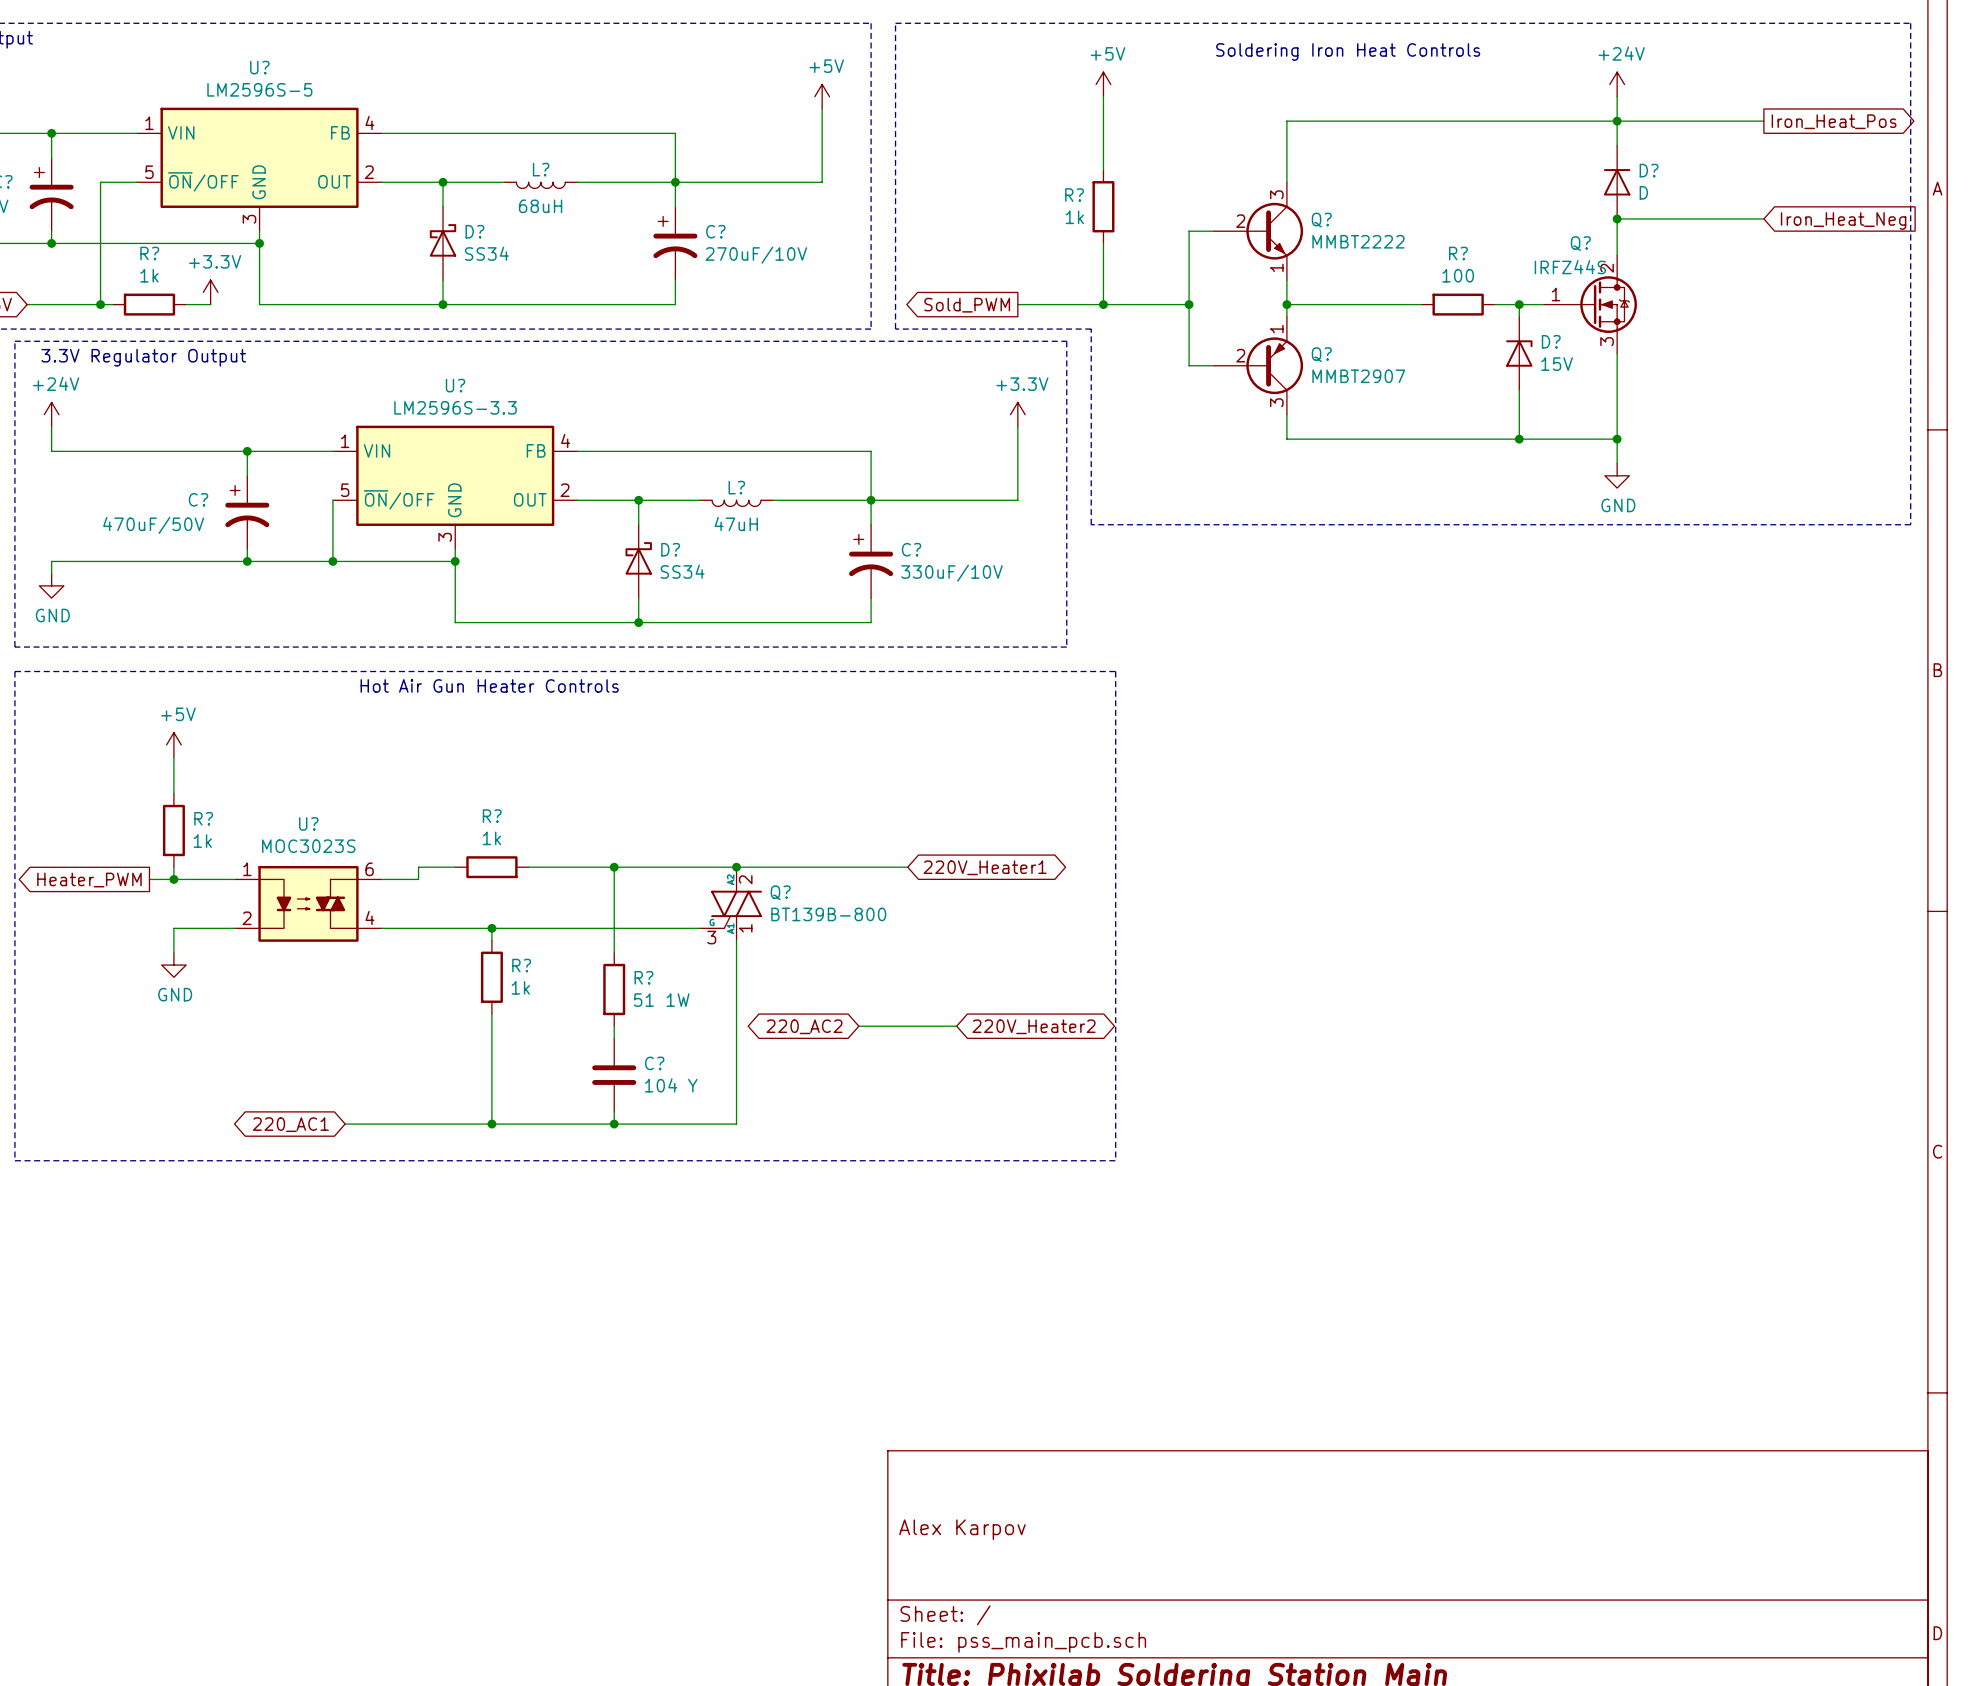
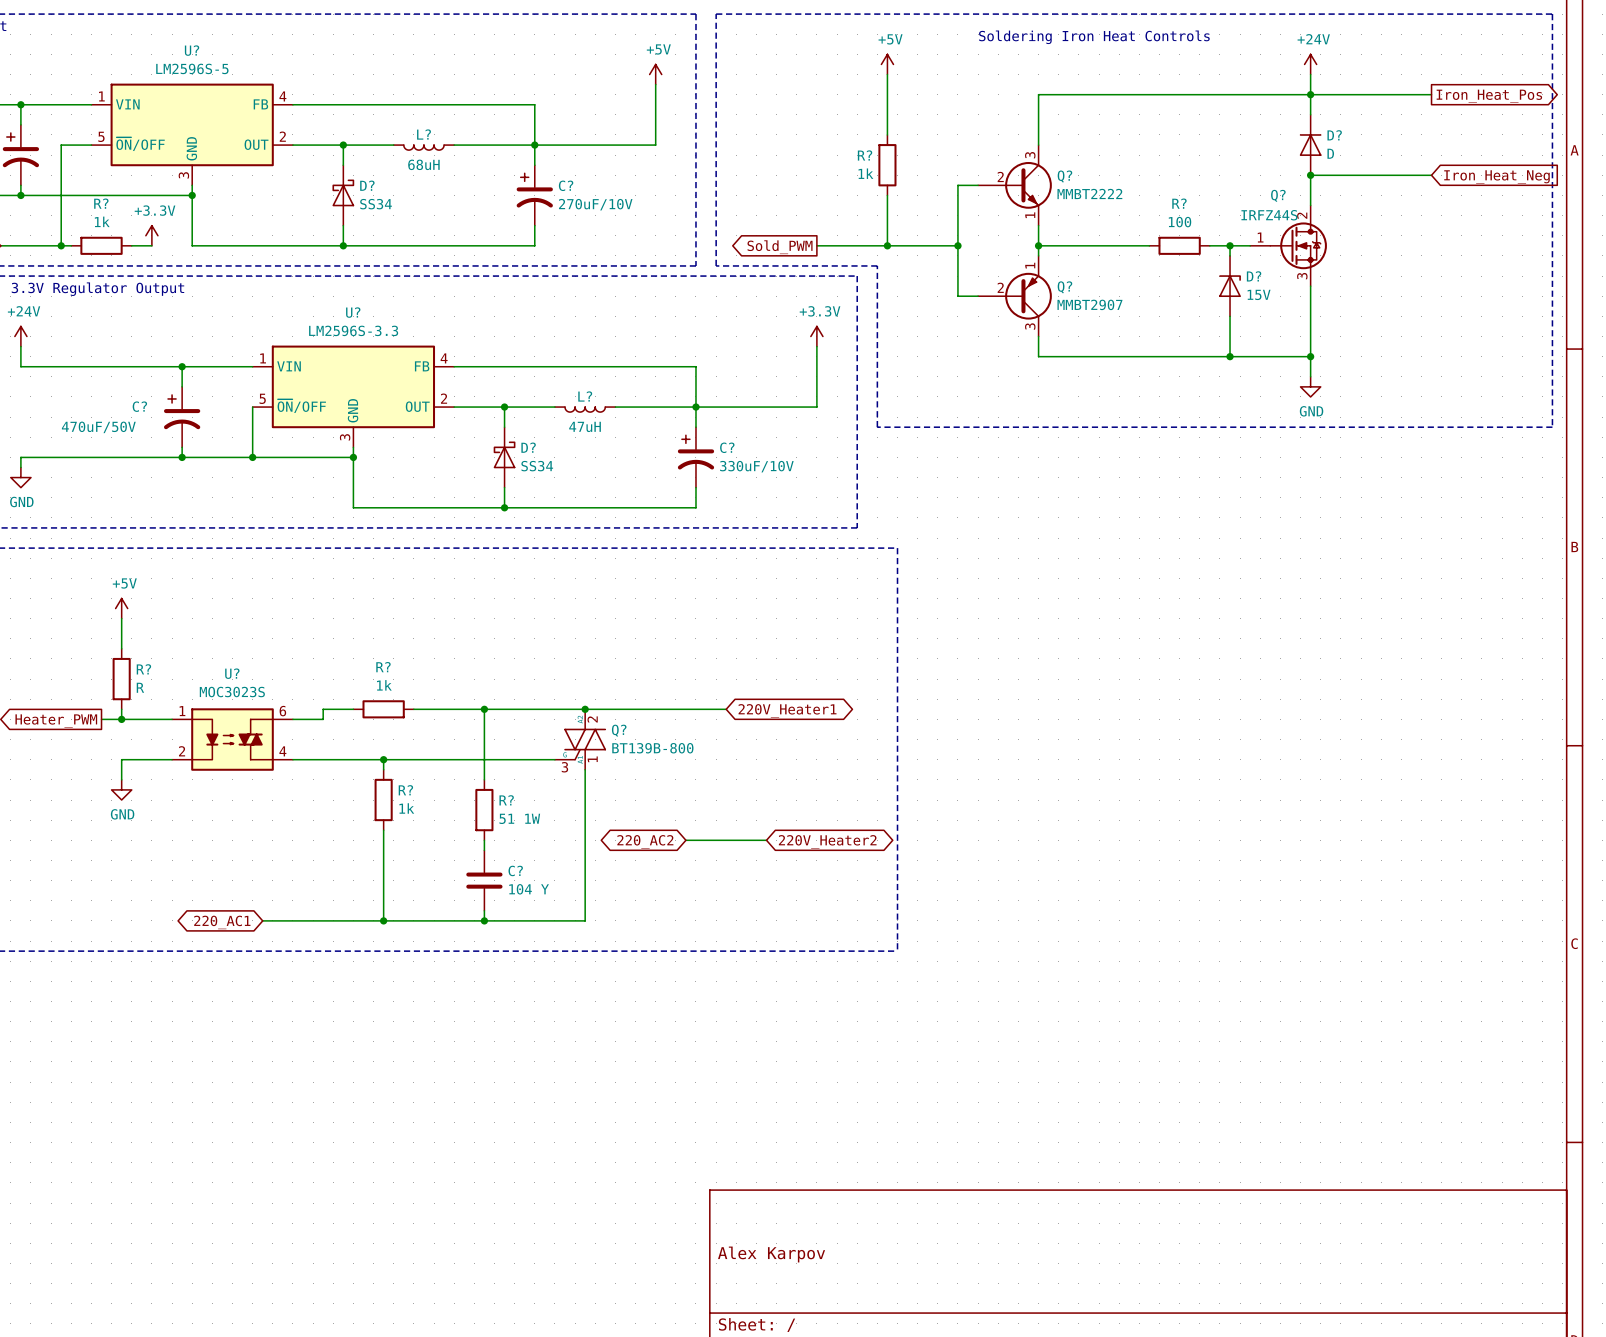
text: Hot Air Gun Heater Controls (489, 685) -> none
R? value: 1k (202, 841) -> R (140, 687)

